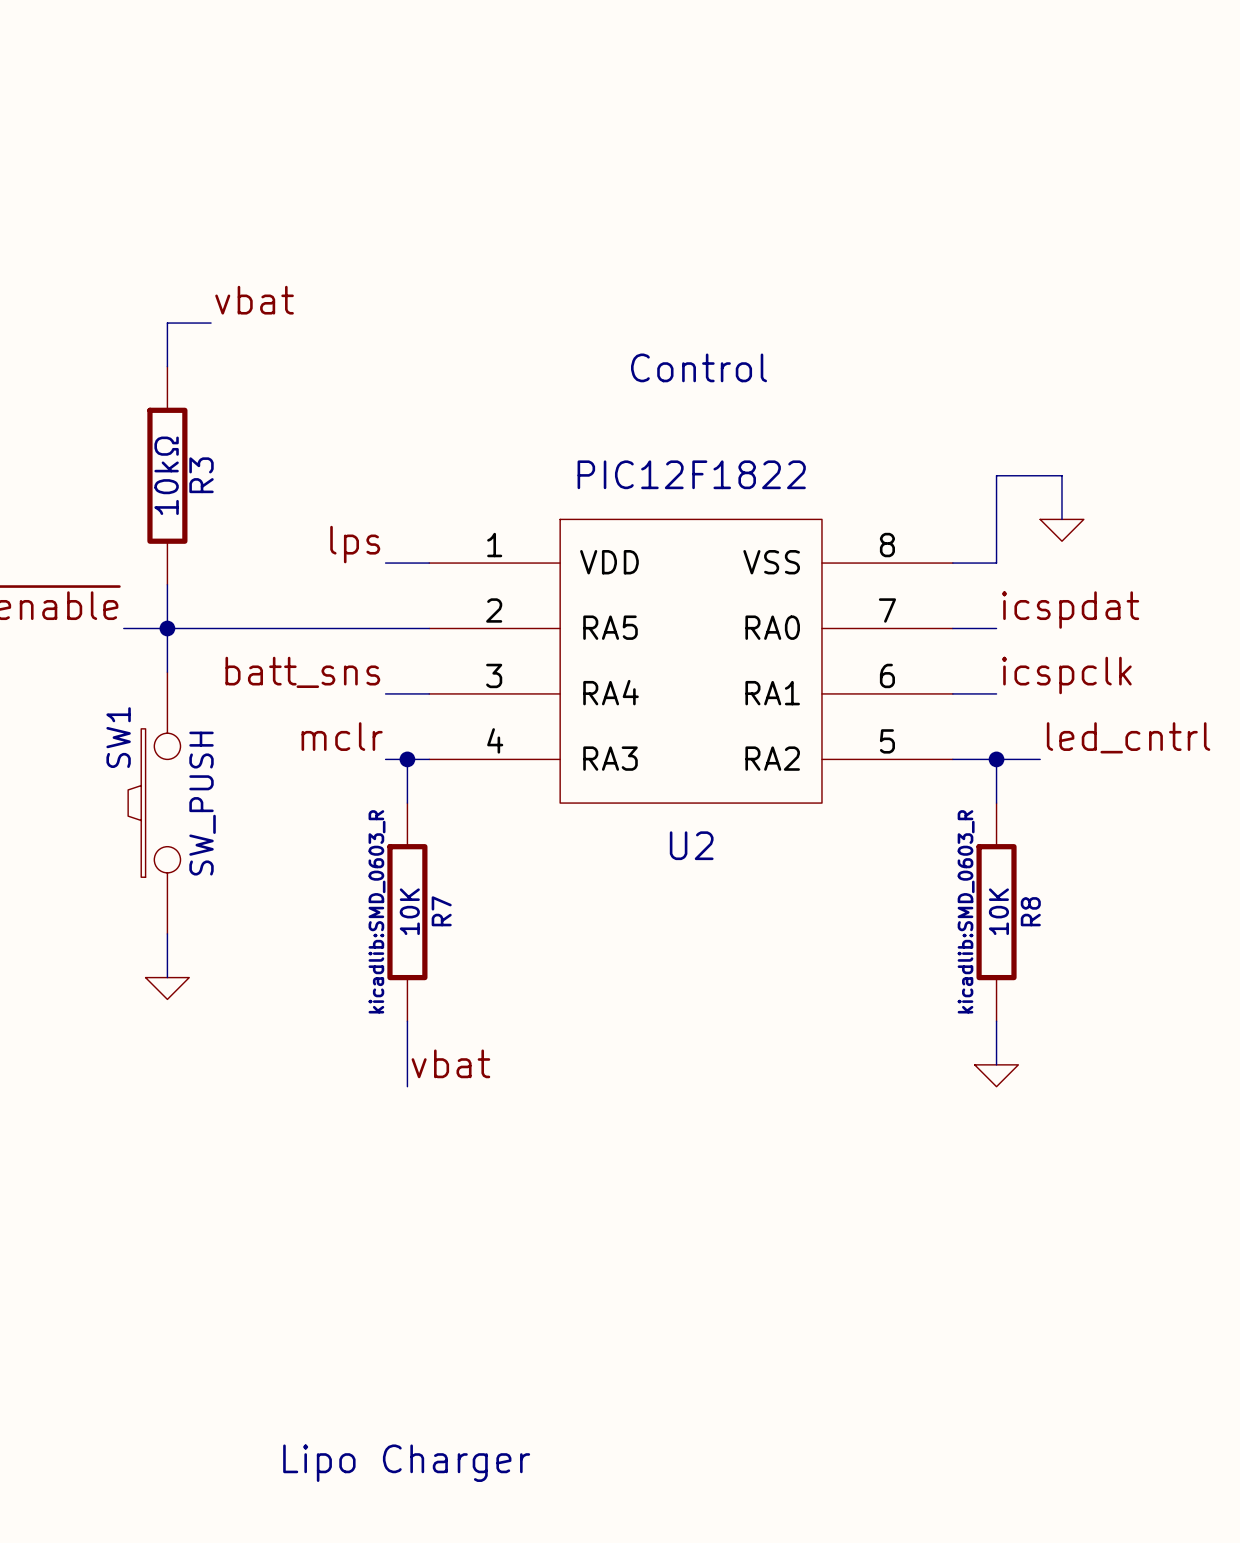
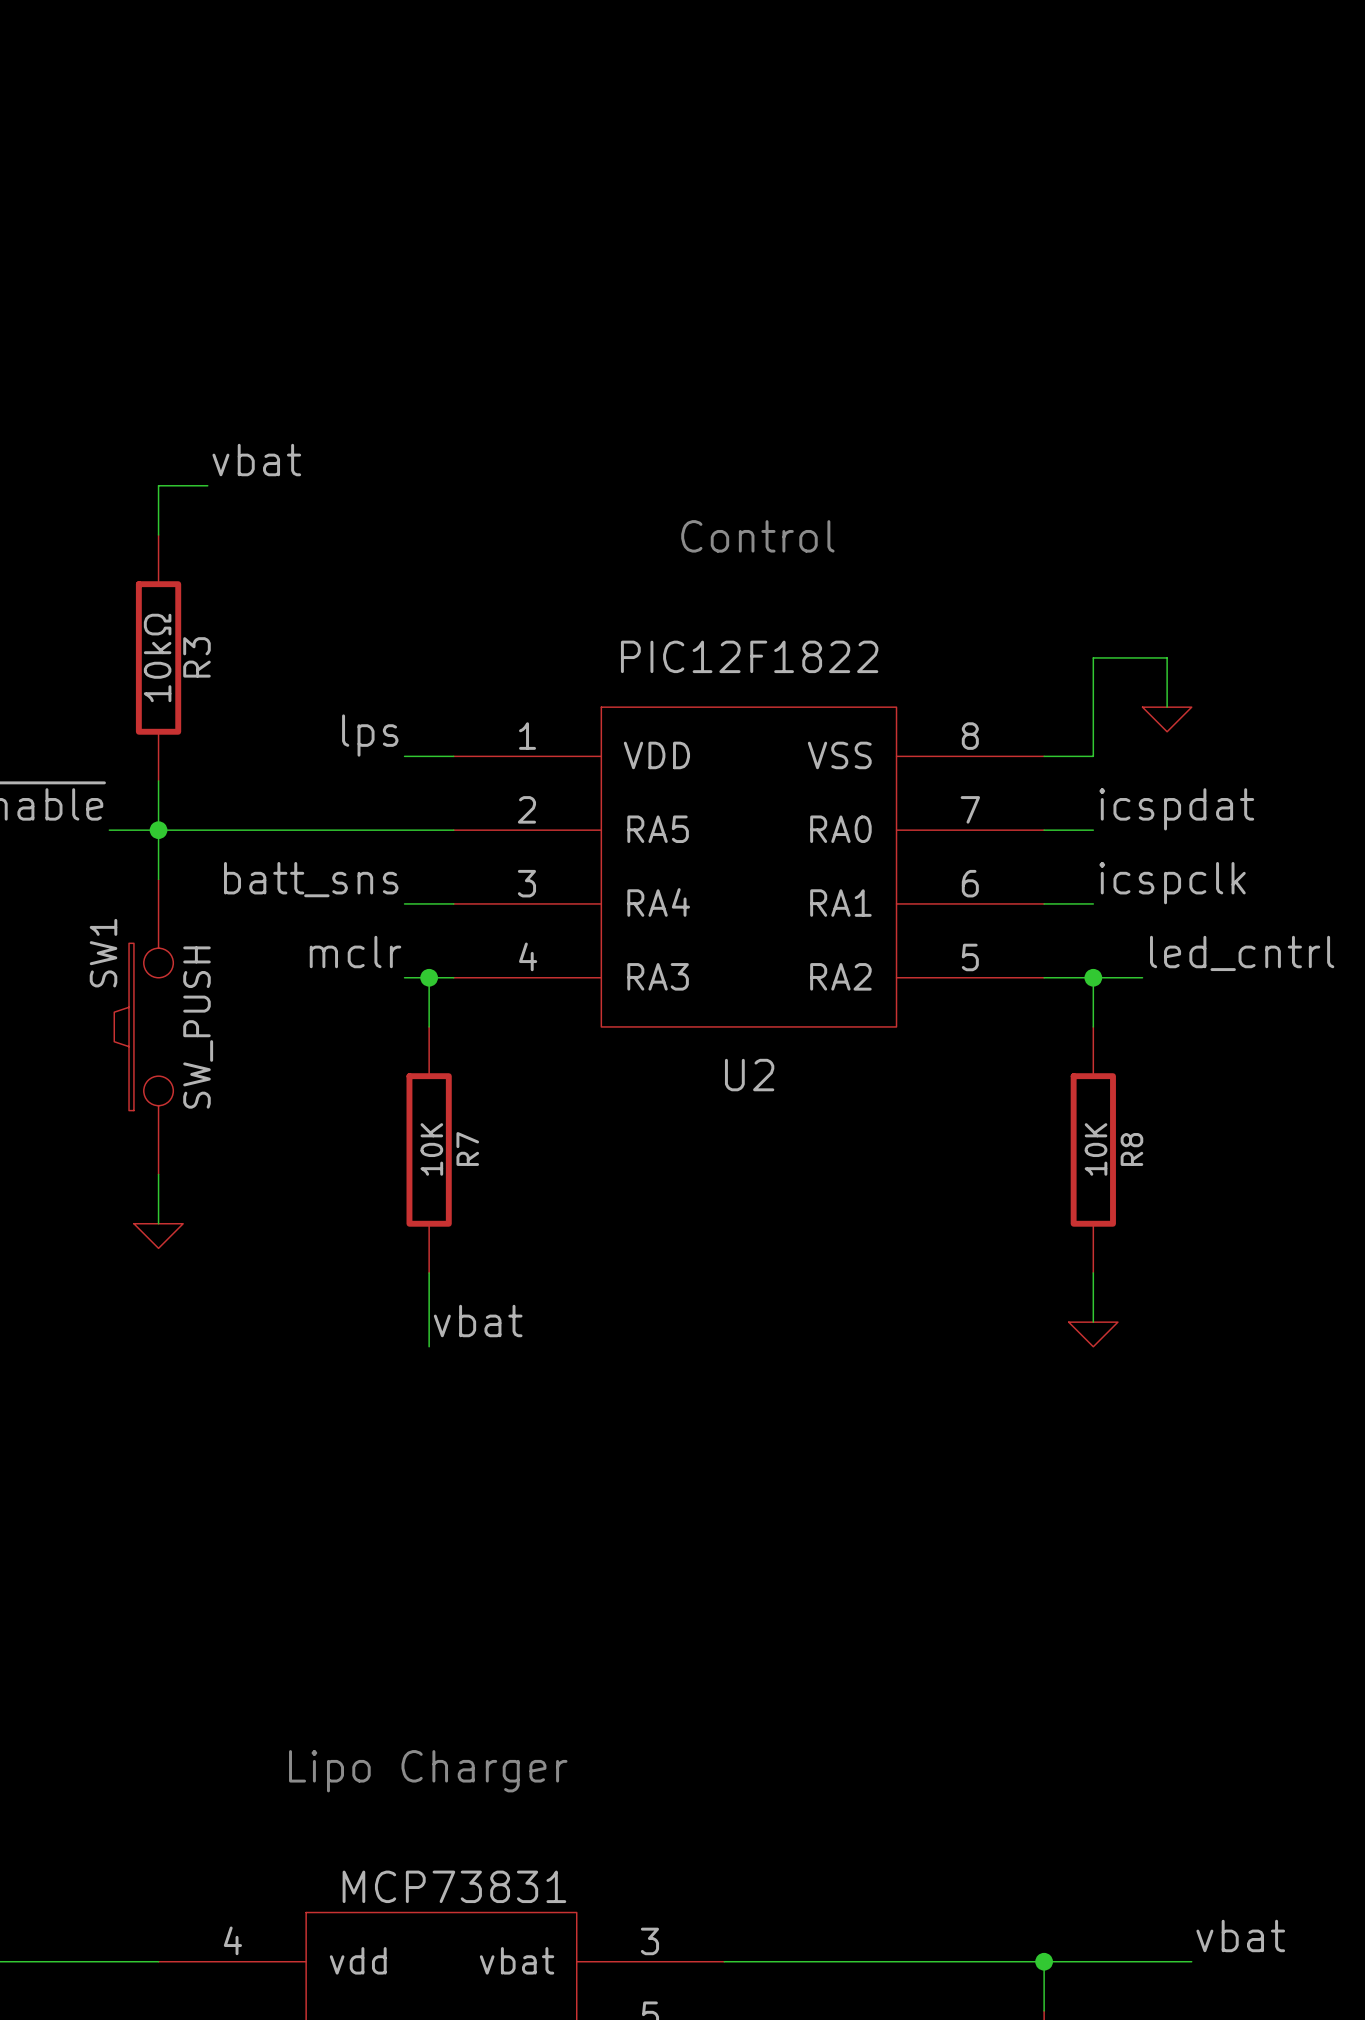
R7 text: kicadlib:SMD_0603_R (377, 911) -> none
R8 text: kicadlib:SMD_0603_R (966, 911) -> none

